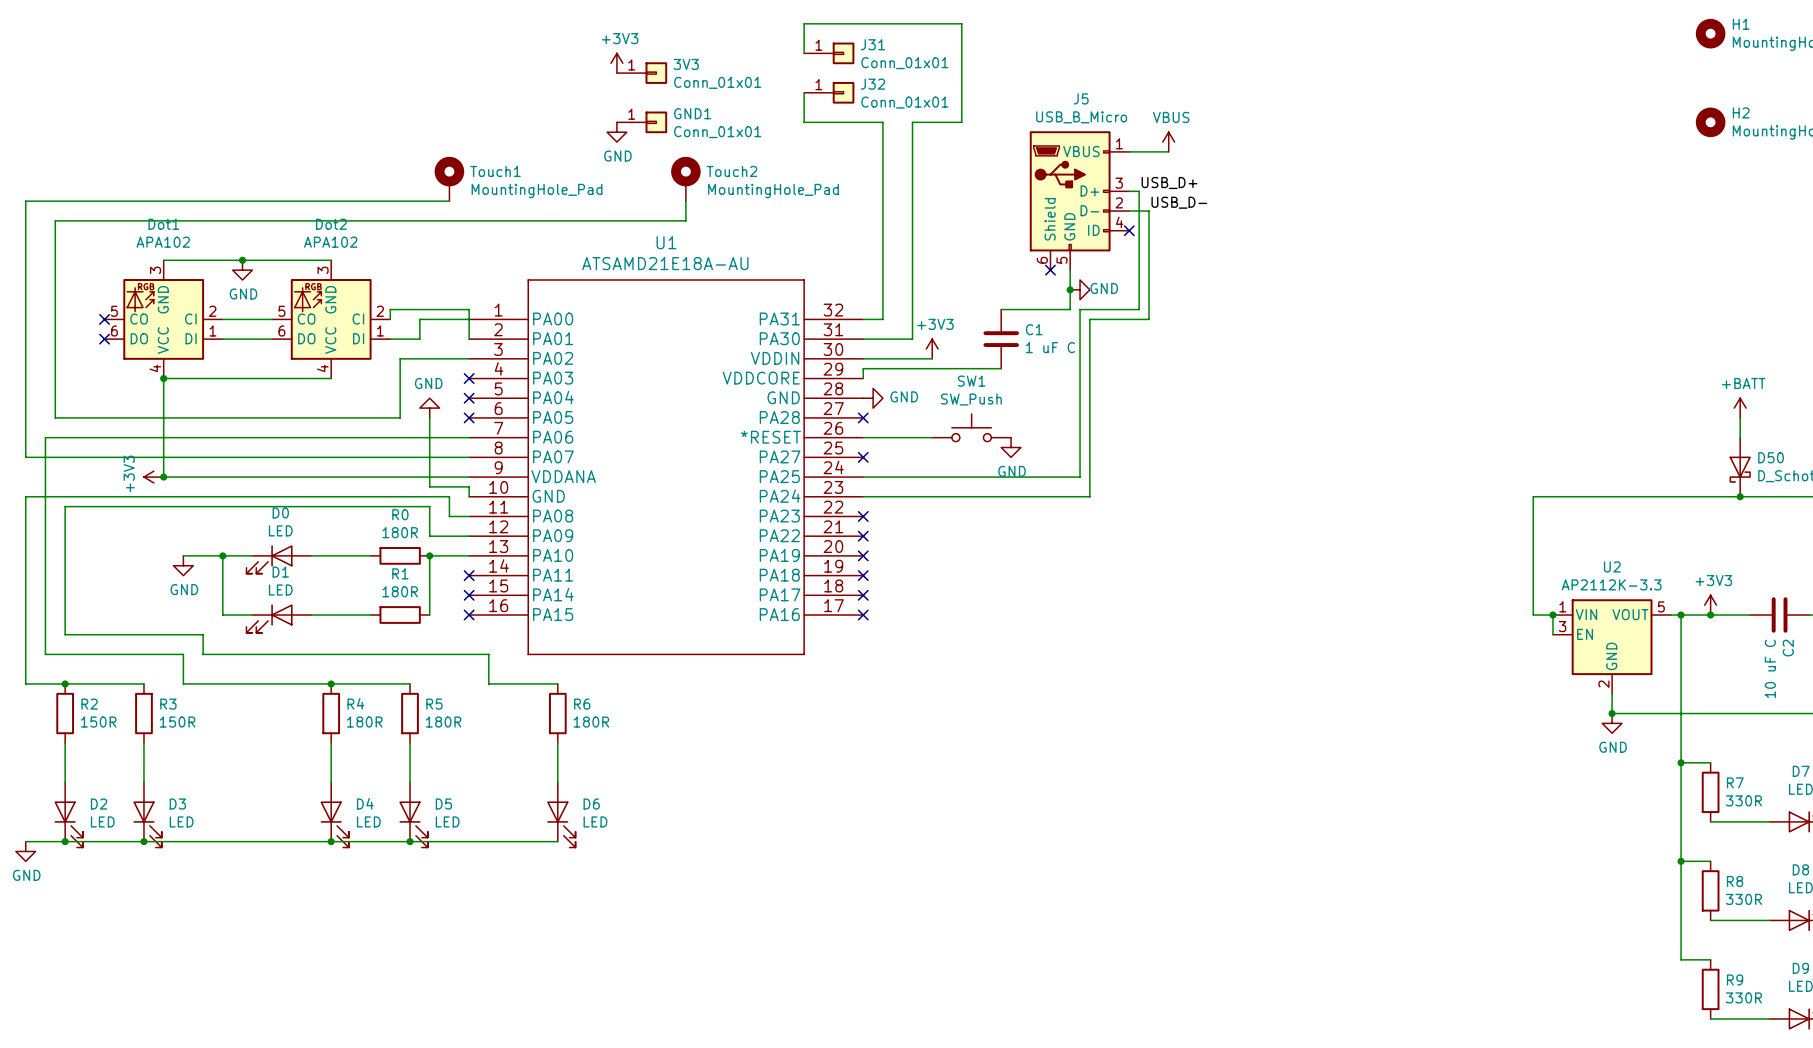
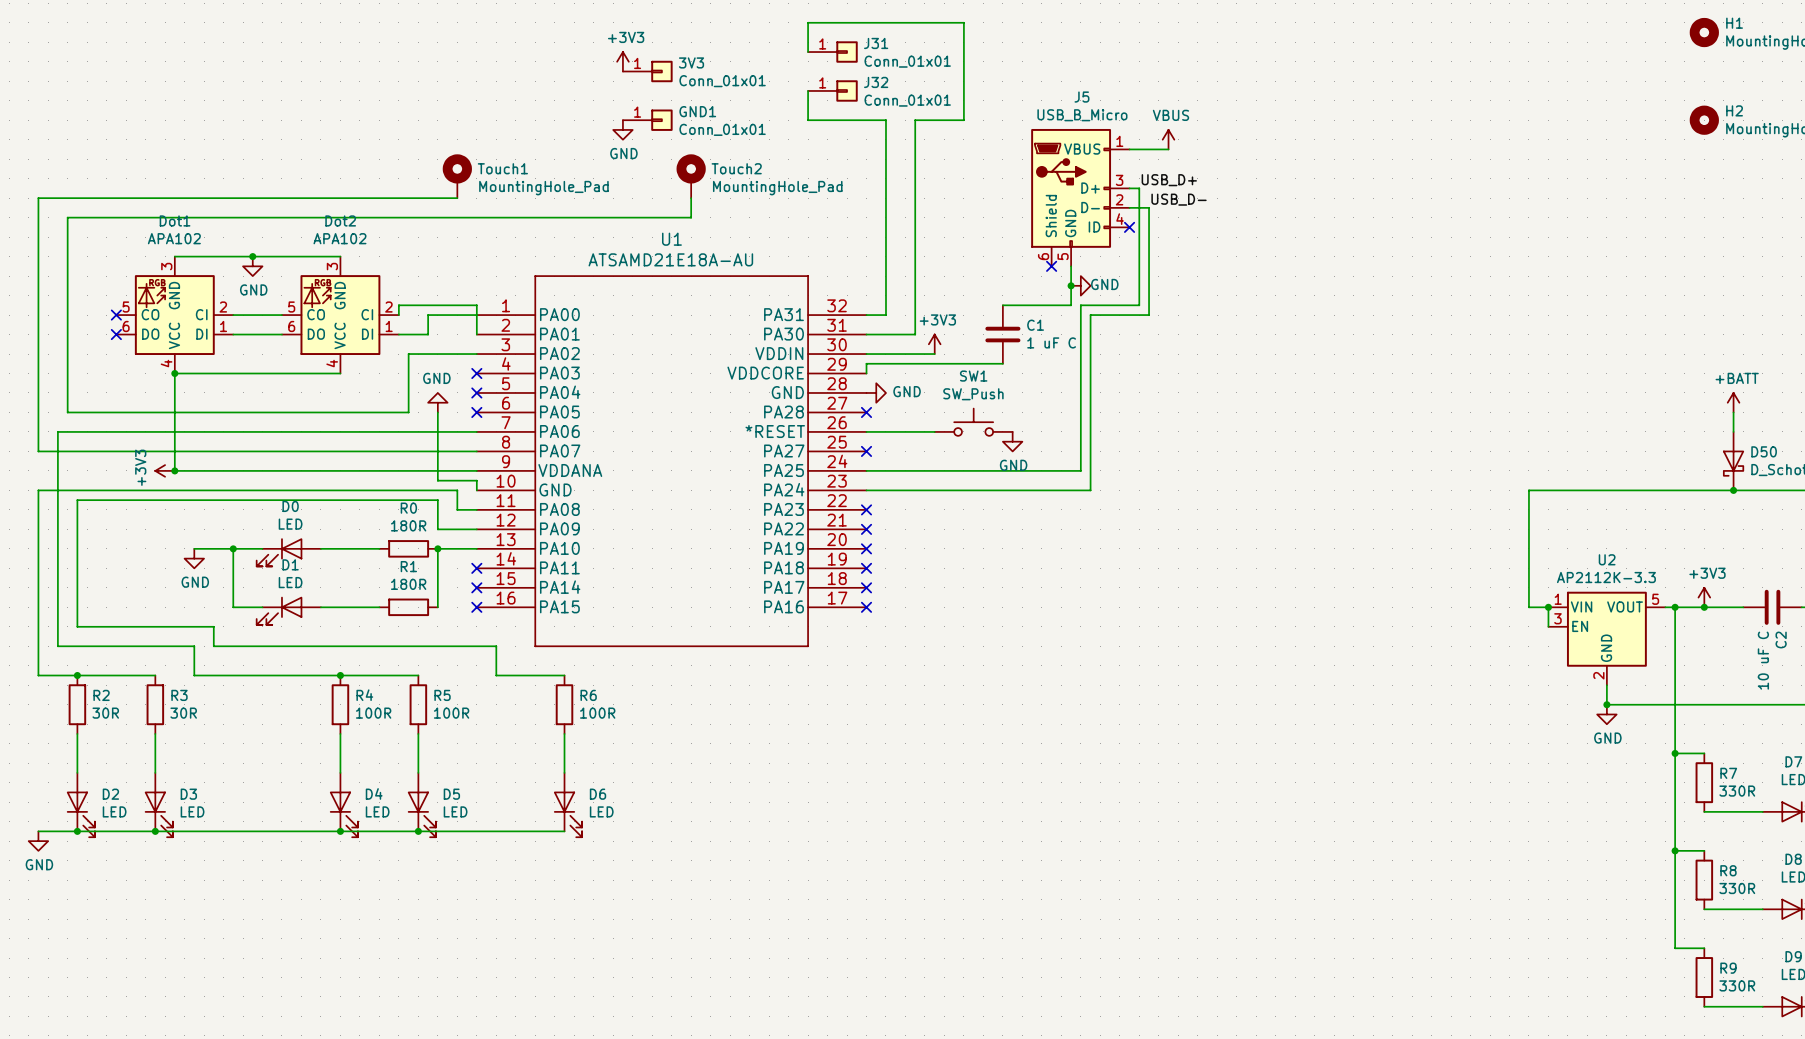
R2 value: 150R (98, 722) -> 30R (105, 713)
R3 value: 150R (177, 722) -> 30R (183, 713)
R4 value: 180R (364, 722) -> 100R (373, 713)
R5 value: 180R (443, 722) -> 100R (451, 713)
R6 value: 180R (591, 722) -> 100R (597, 713)

